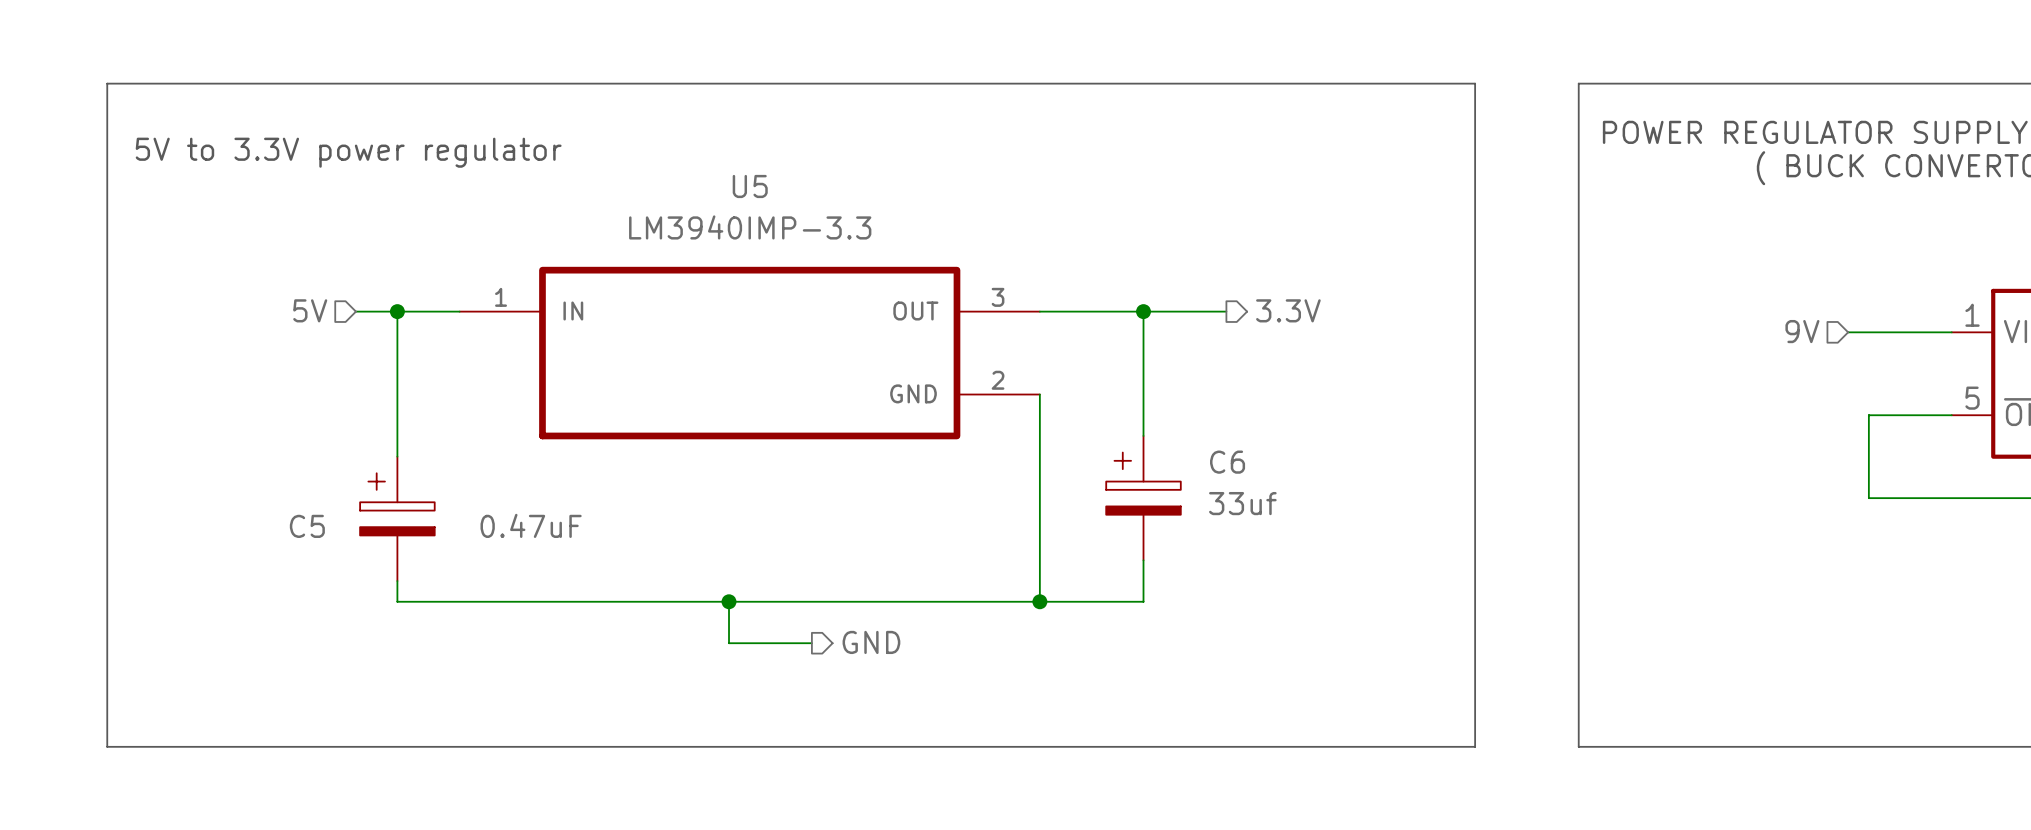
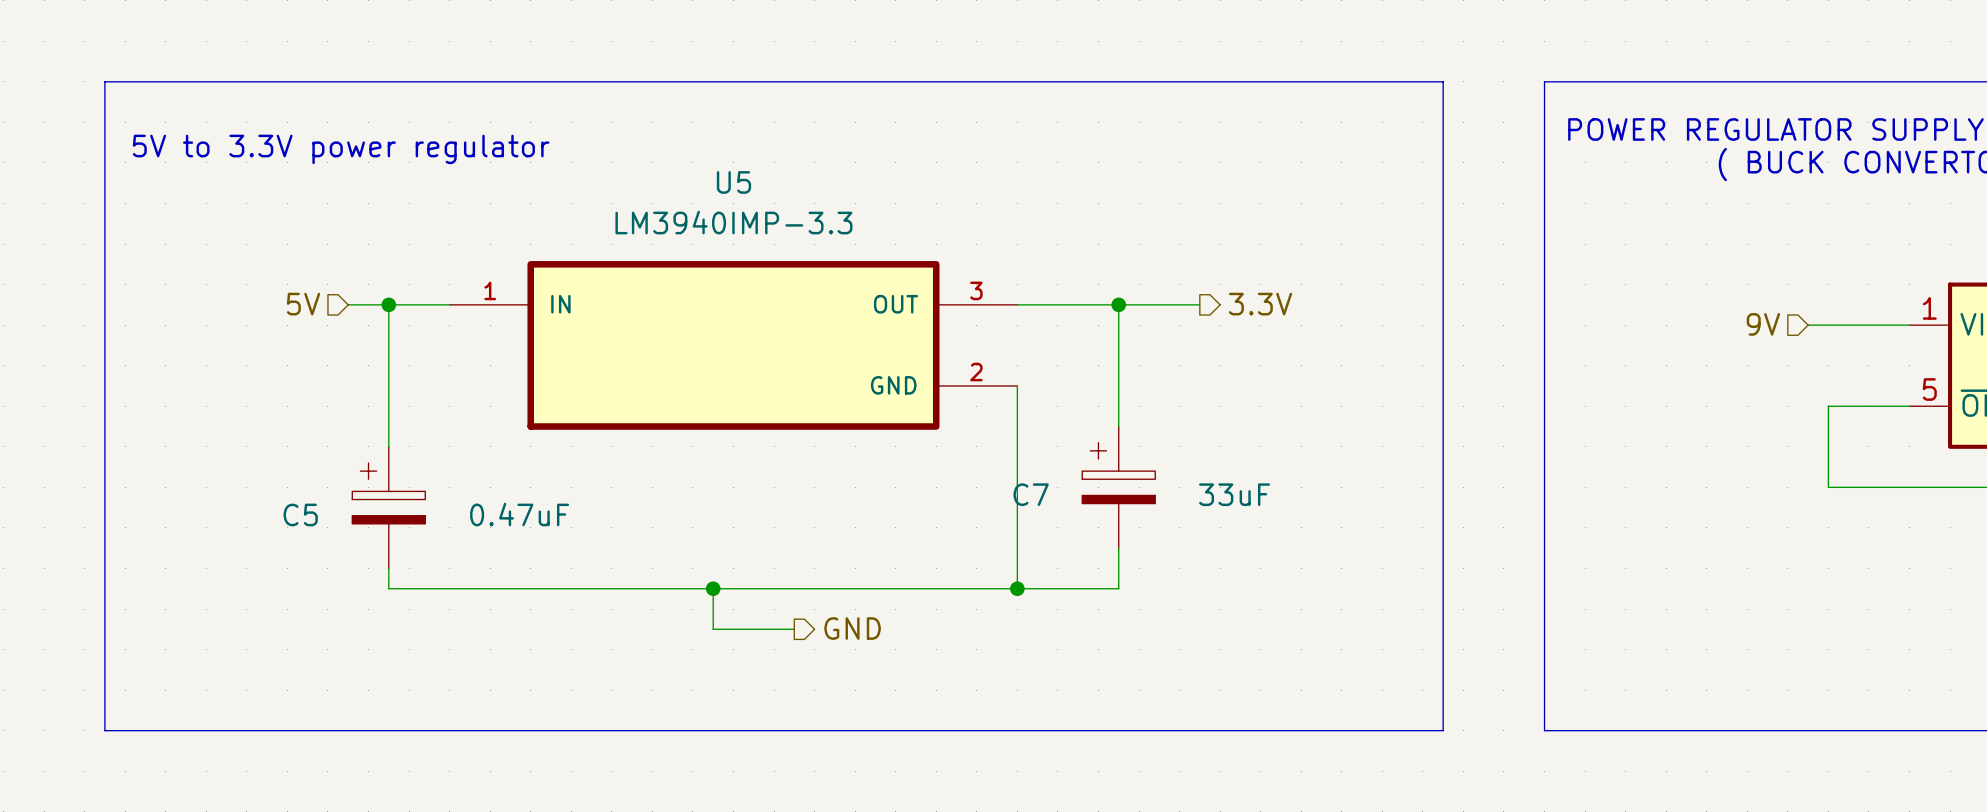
C6 name: C6 (1227, 462) -> C7 (1031, 494)
C6 value: 33uf (1242, 503) -> 33uF (1234, 494)

